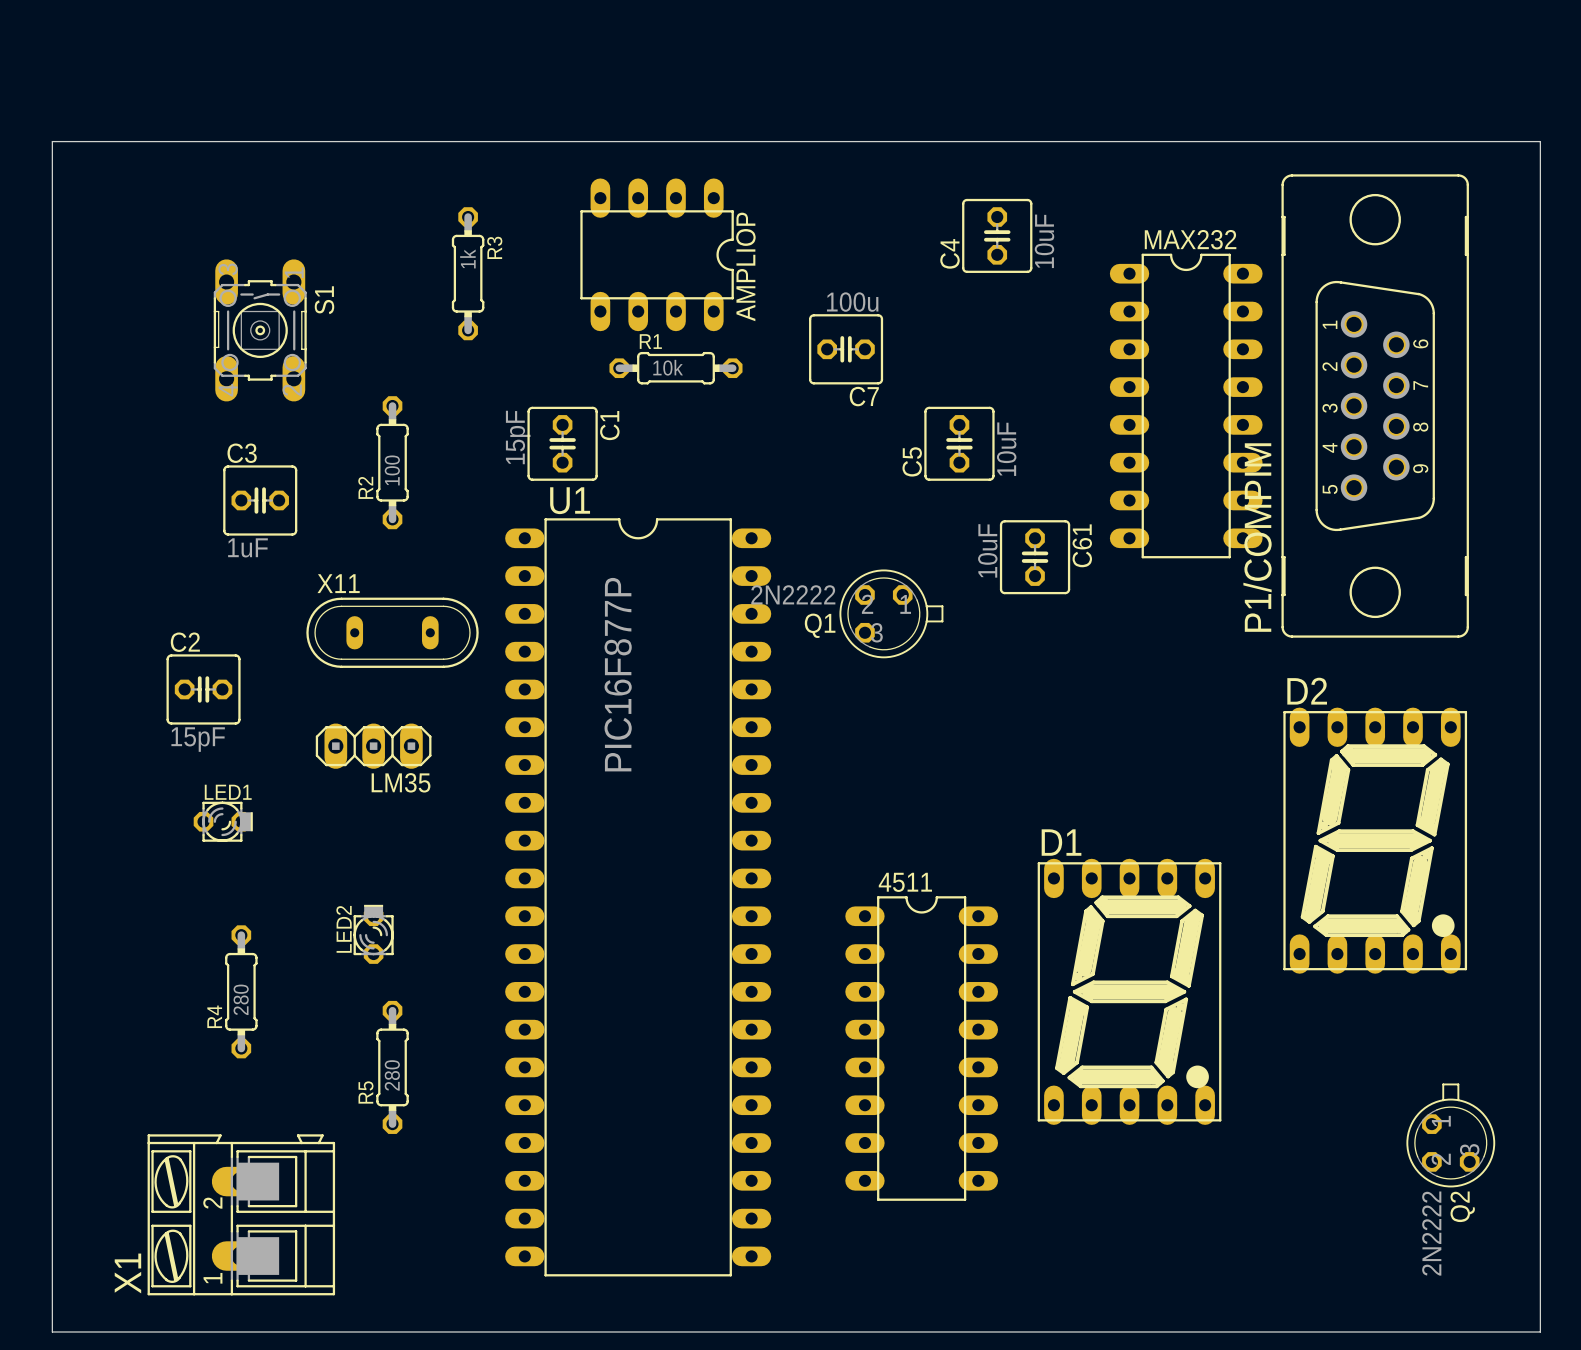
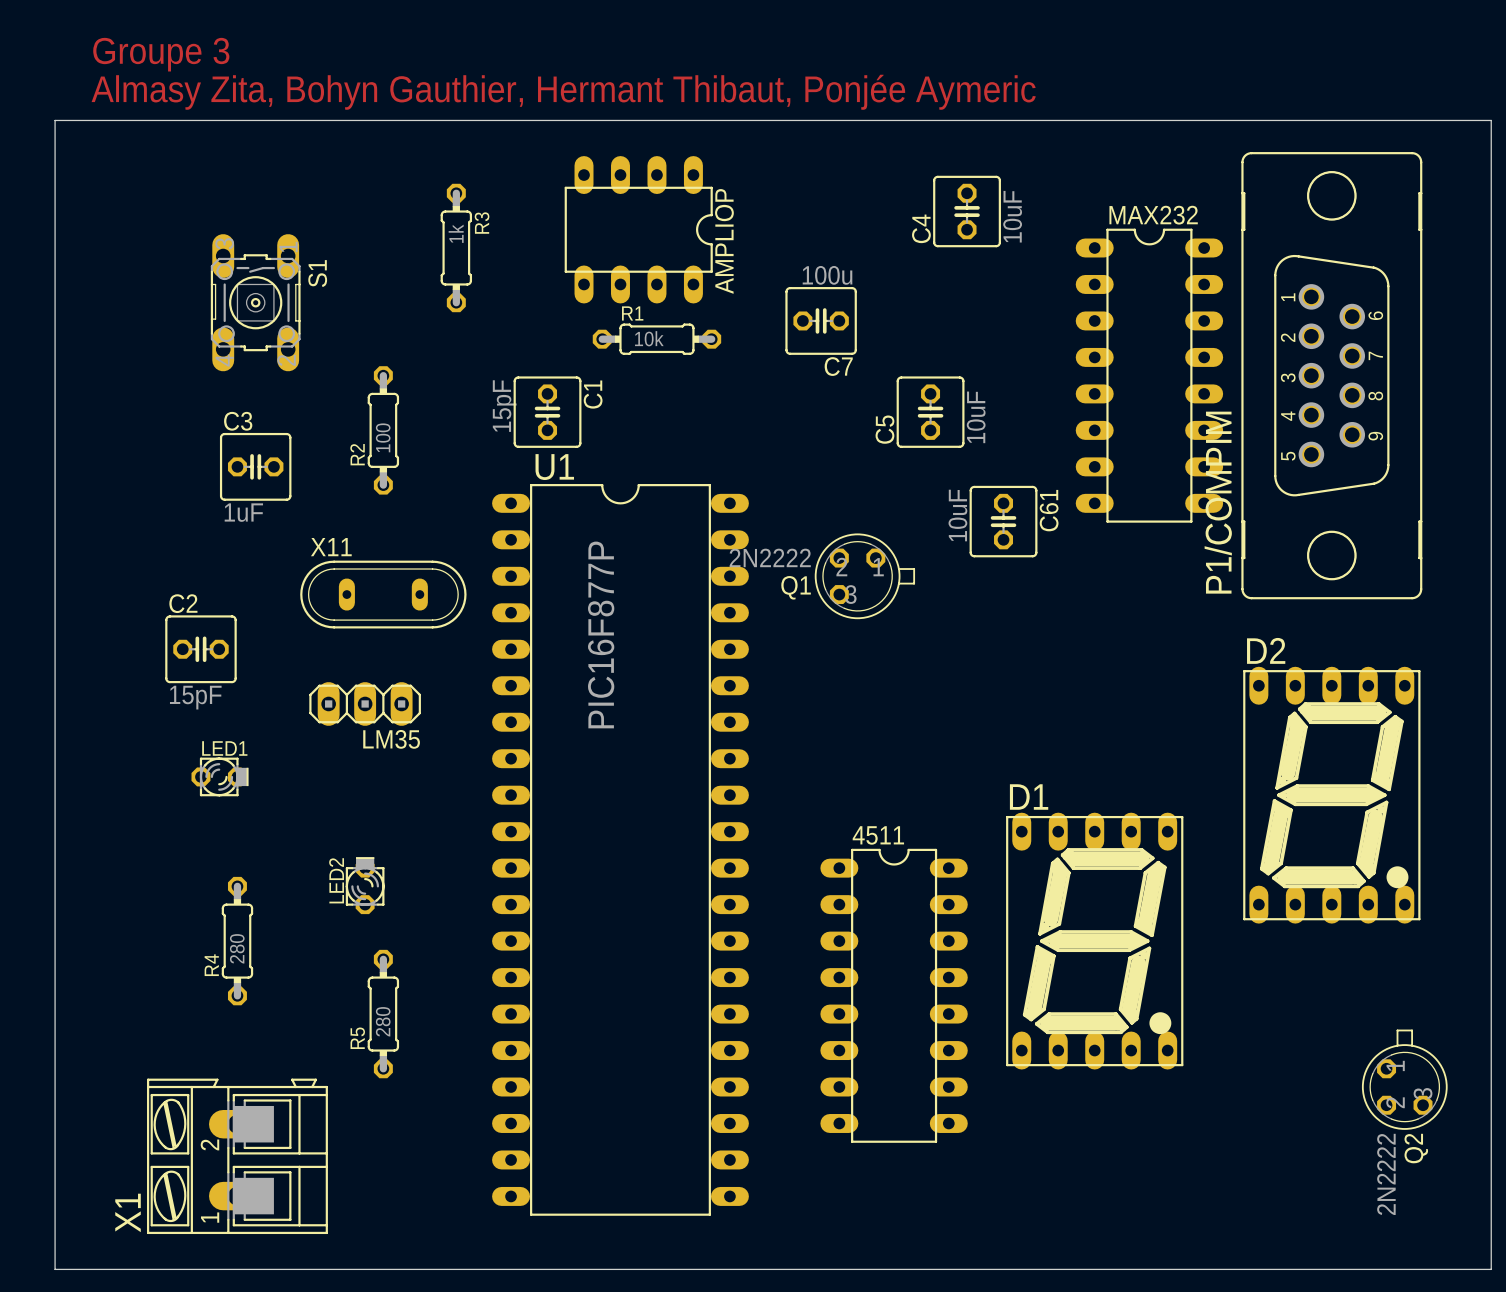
text: none -> Groupe 3 (161, 54)
text: none -> Almasy Zita, Bohyn Gauthier, Hermant Thibaut, Ponjée Aymeric (563, 92)

